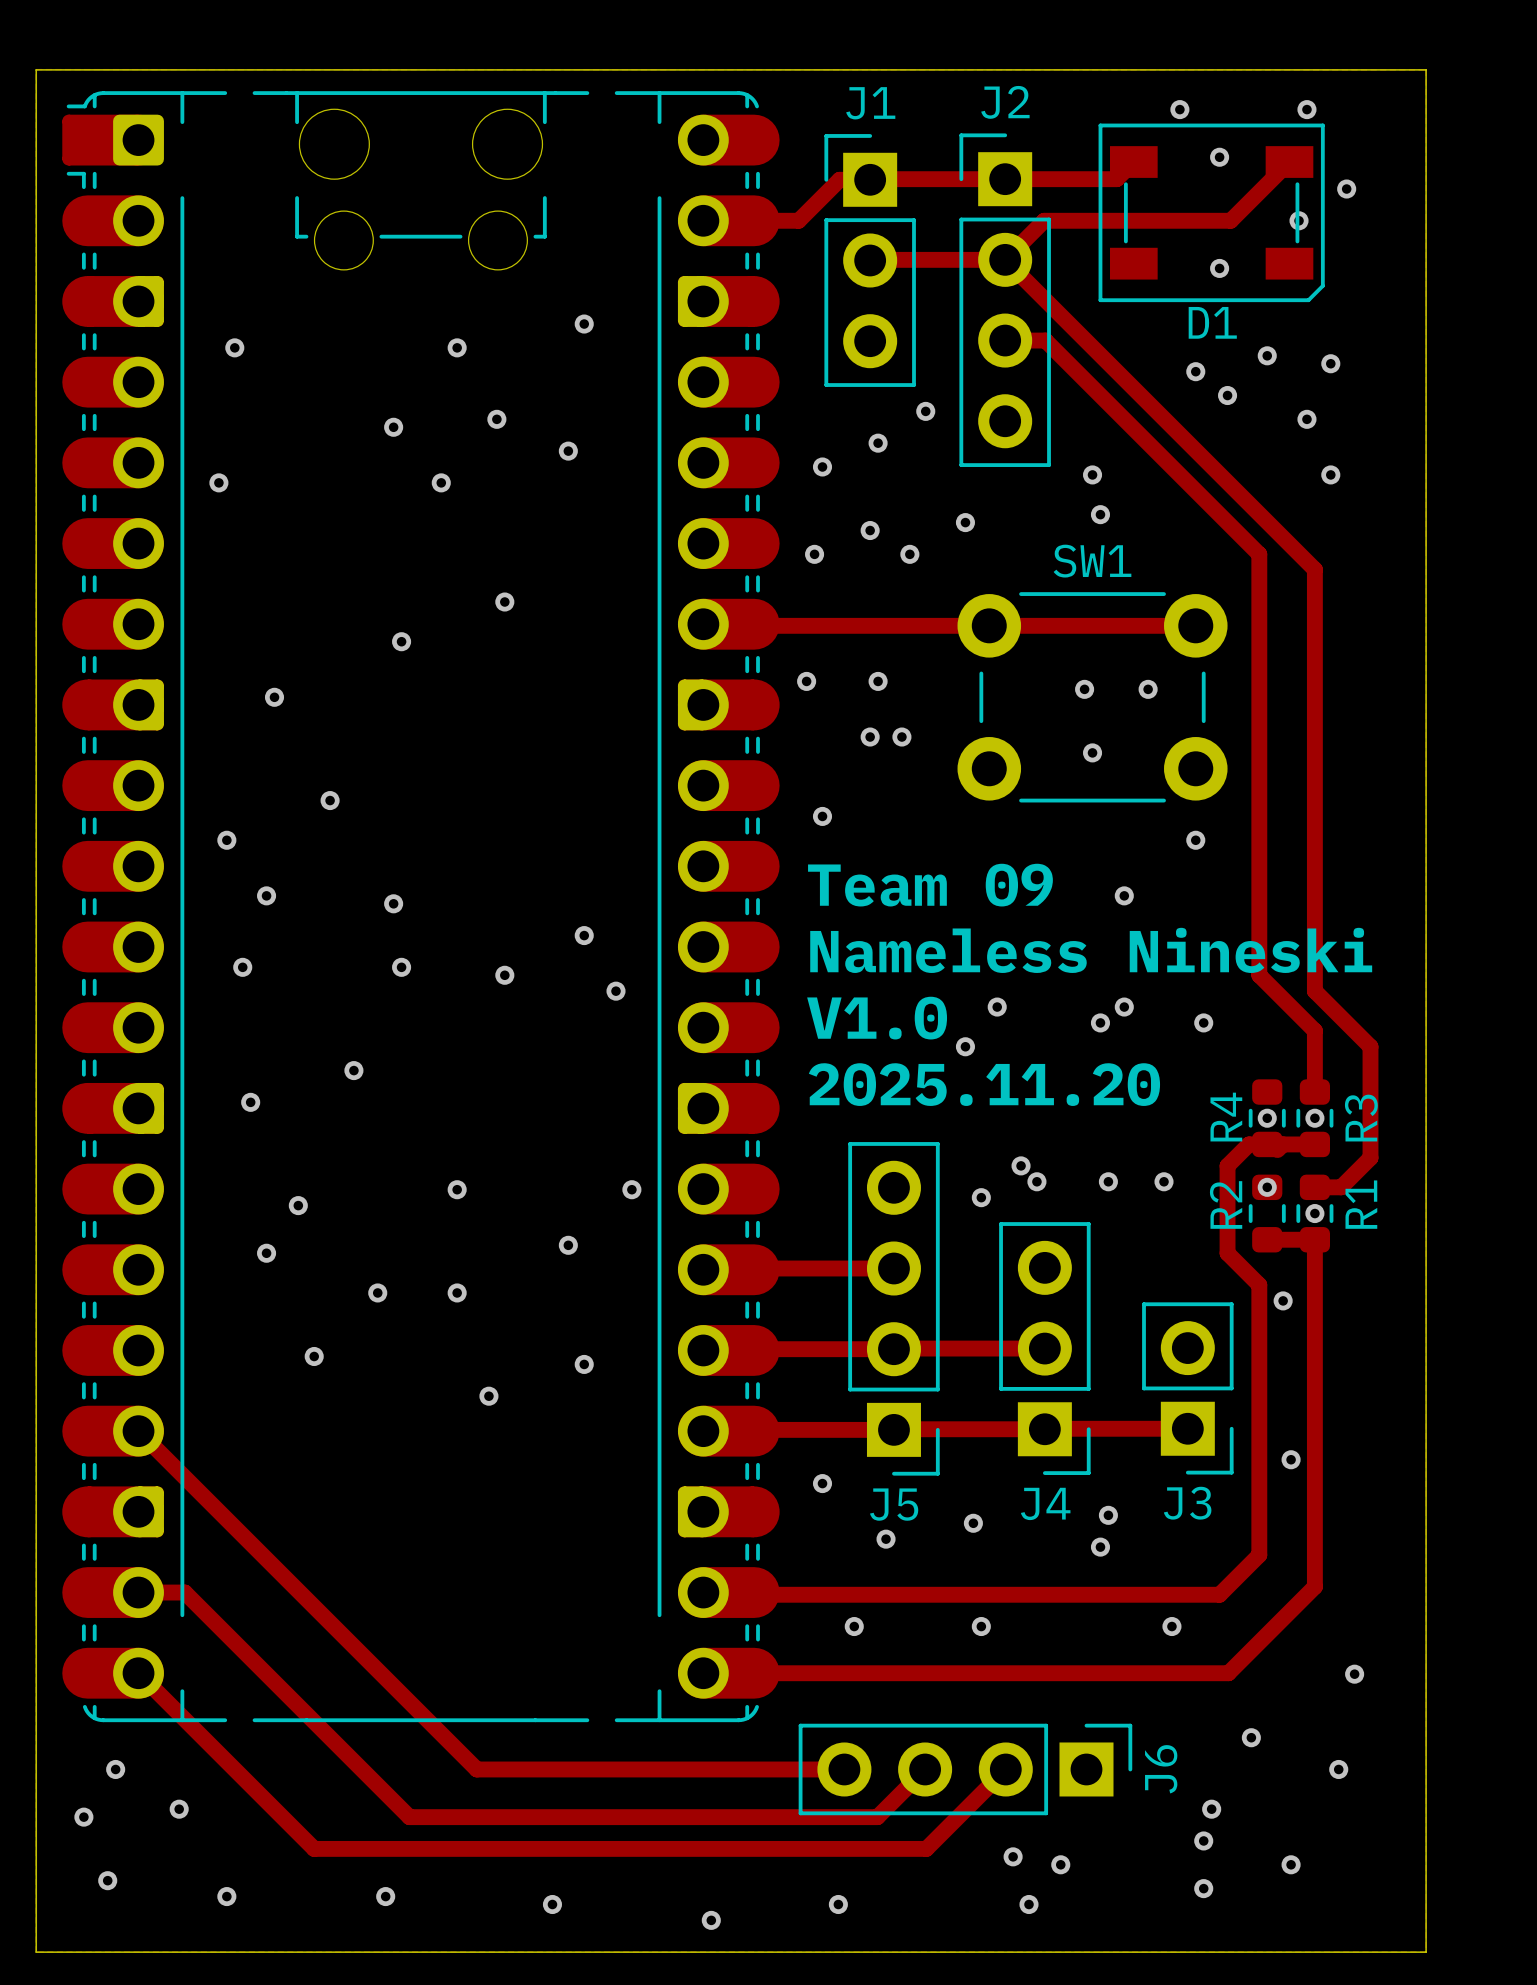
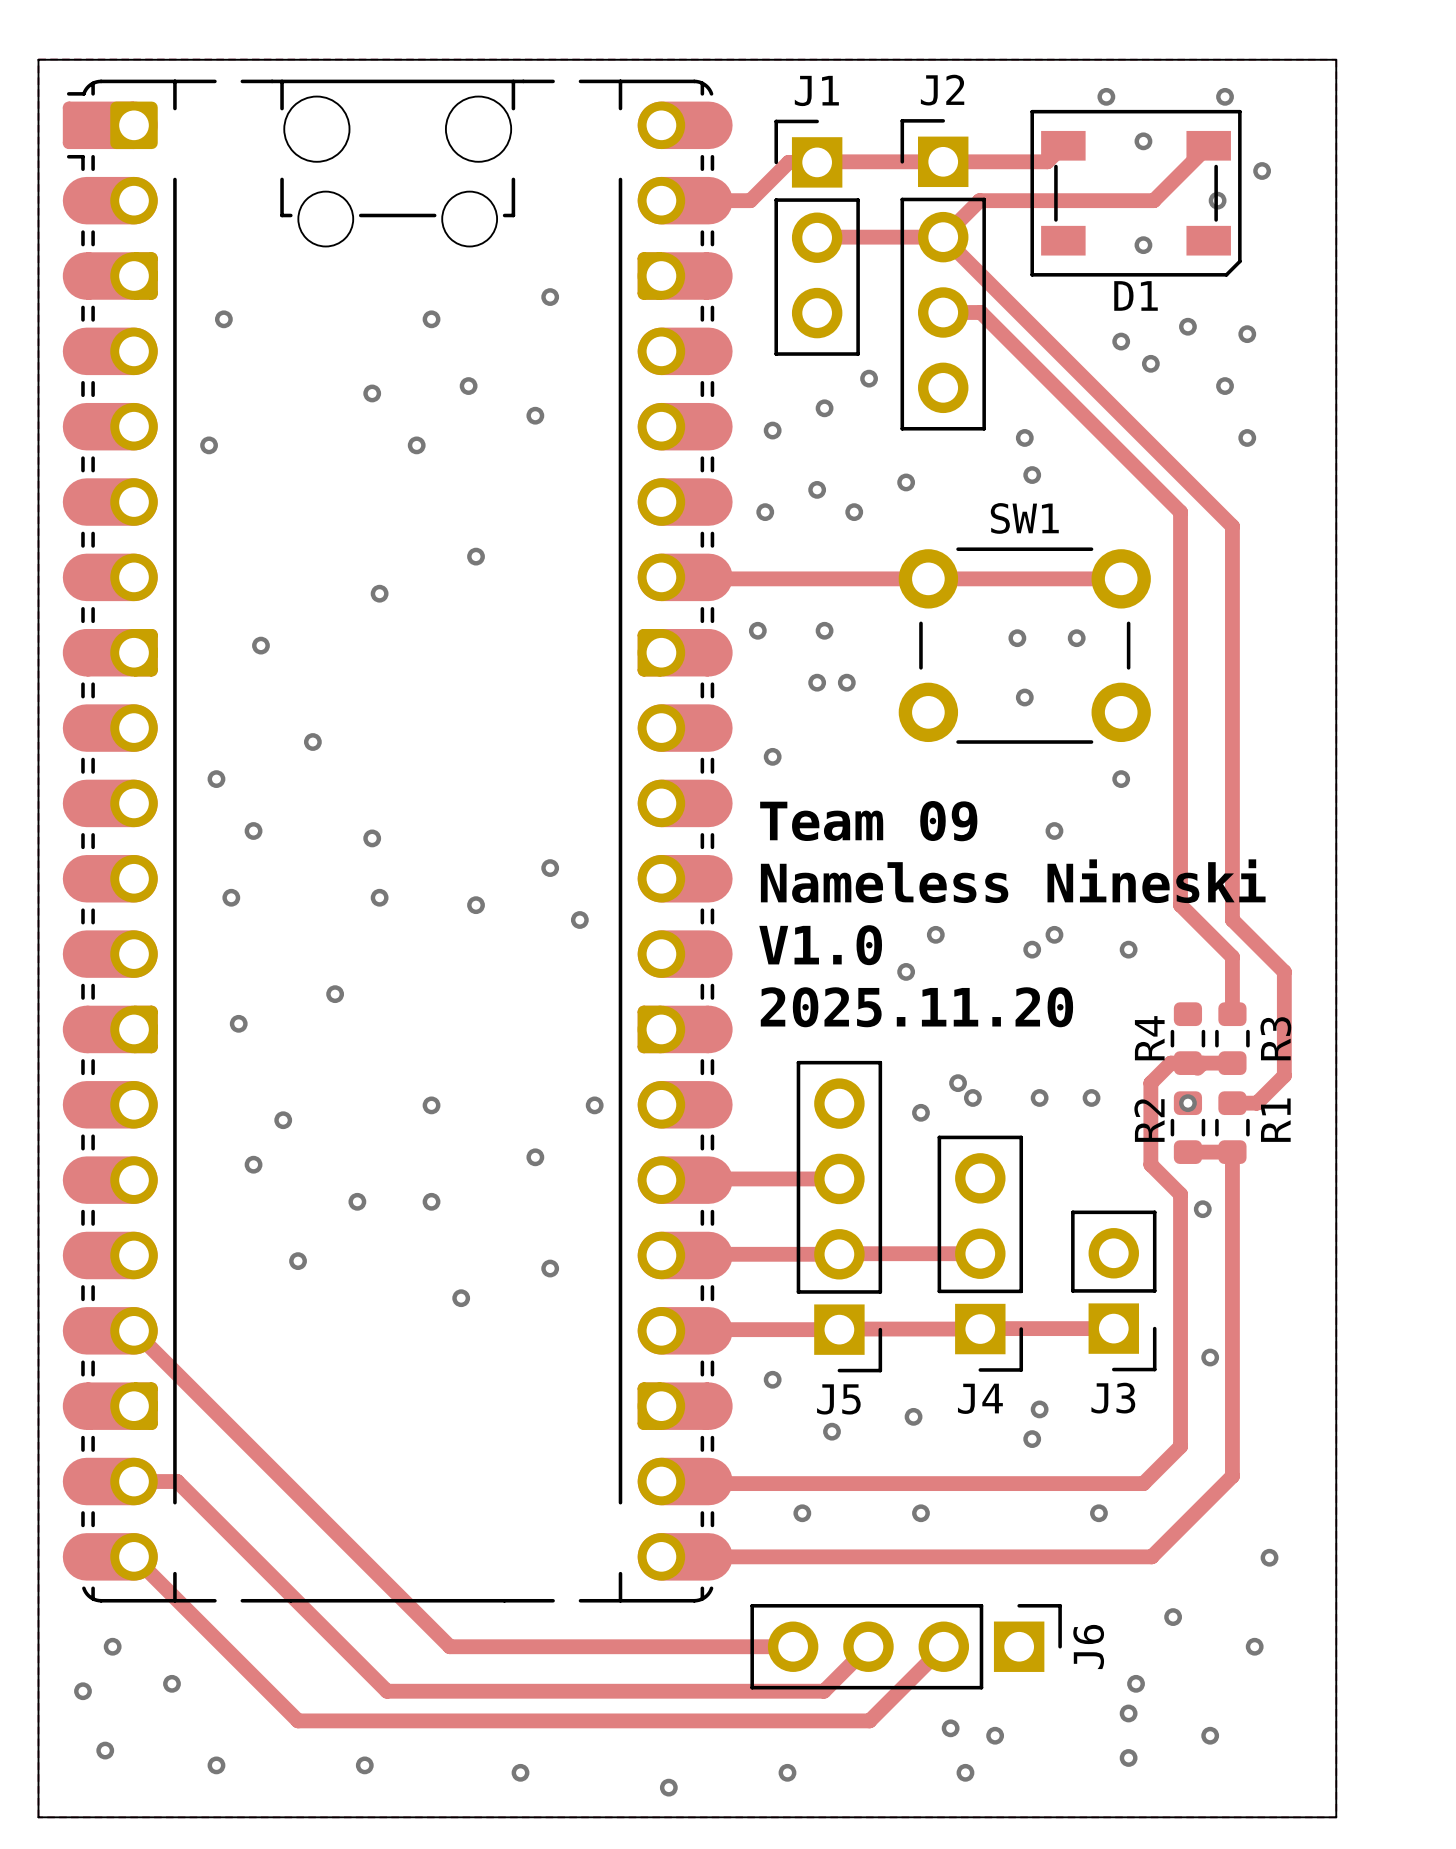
via: (1267, 1118) -> none
via: (1314, 1118) -> none
via: (1314, 1213) -> none

